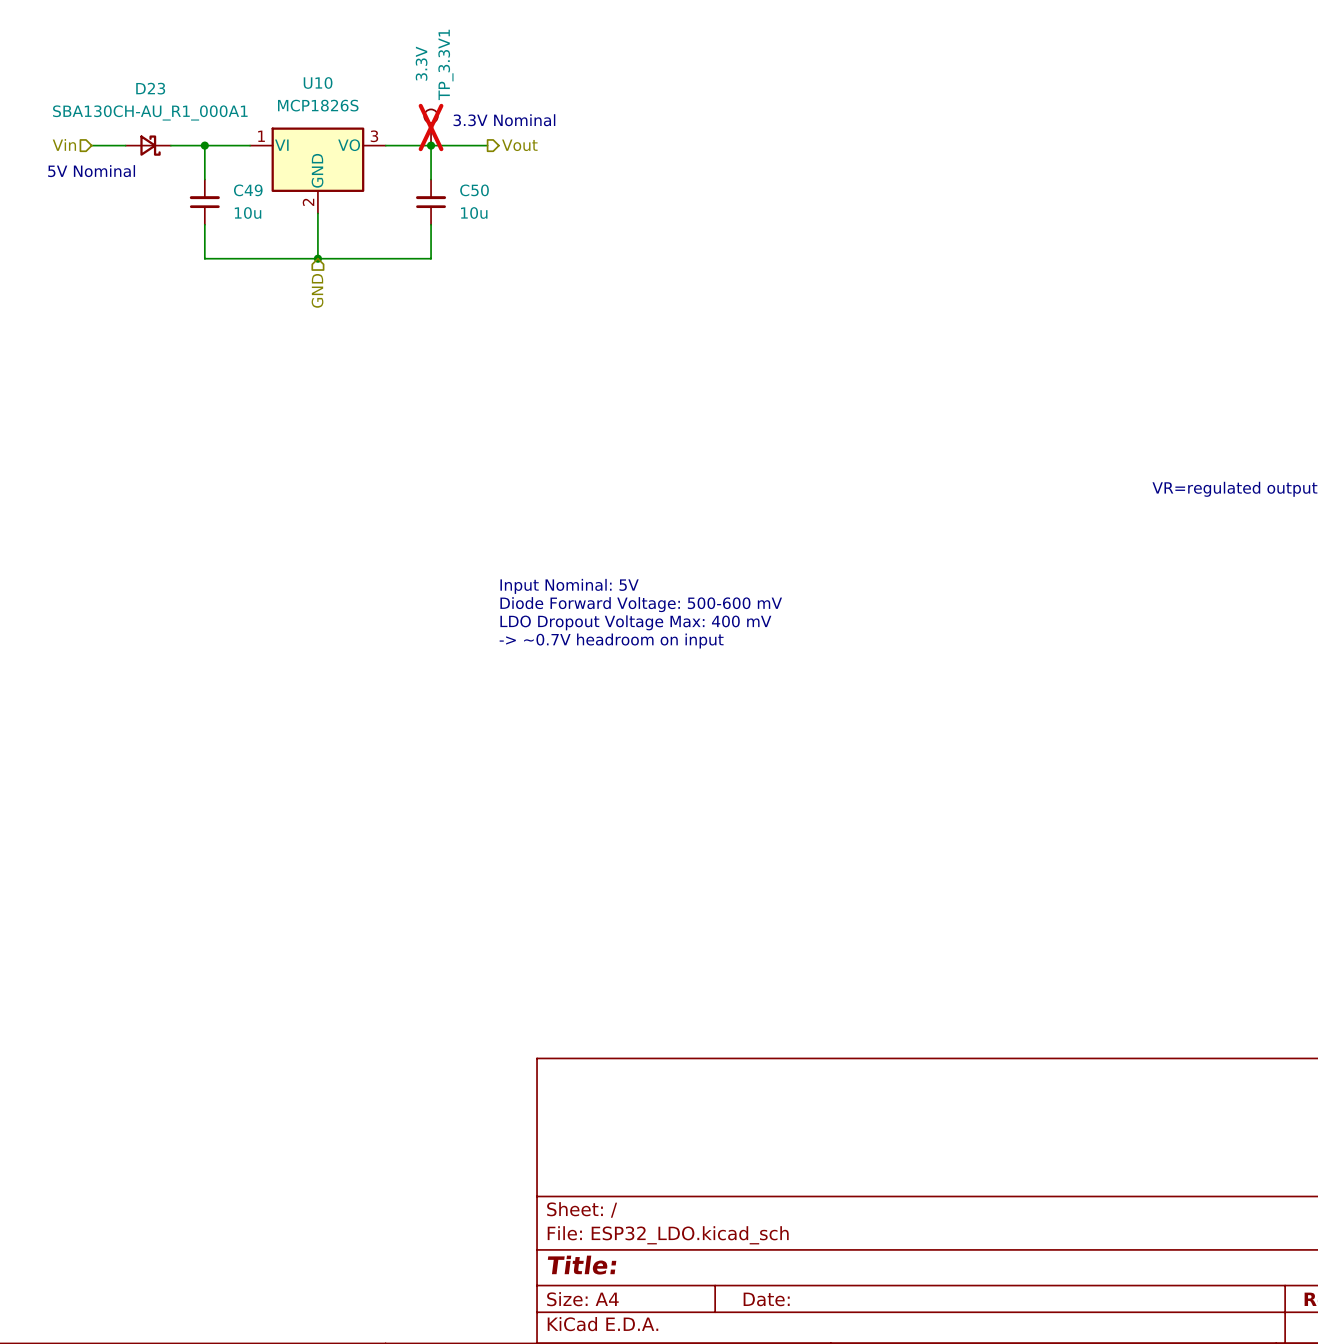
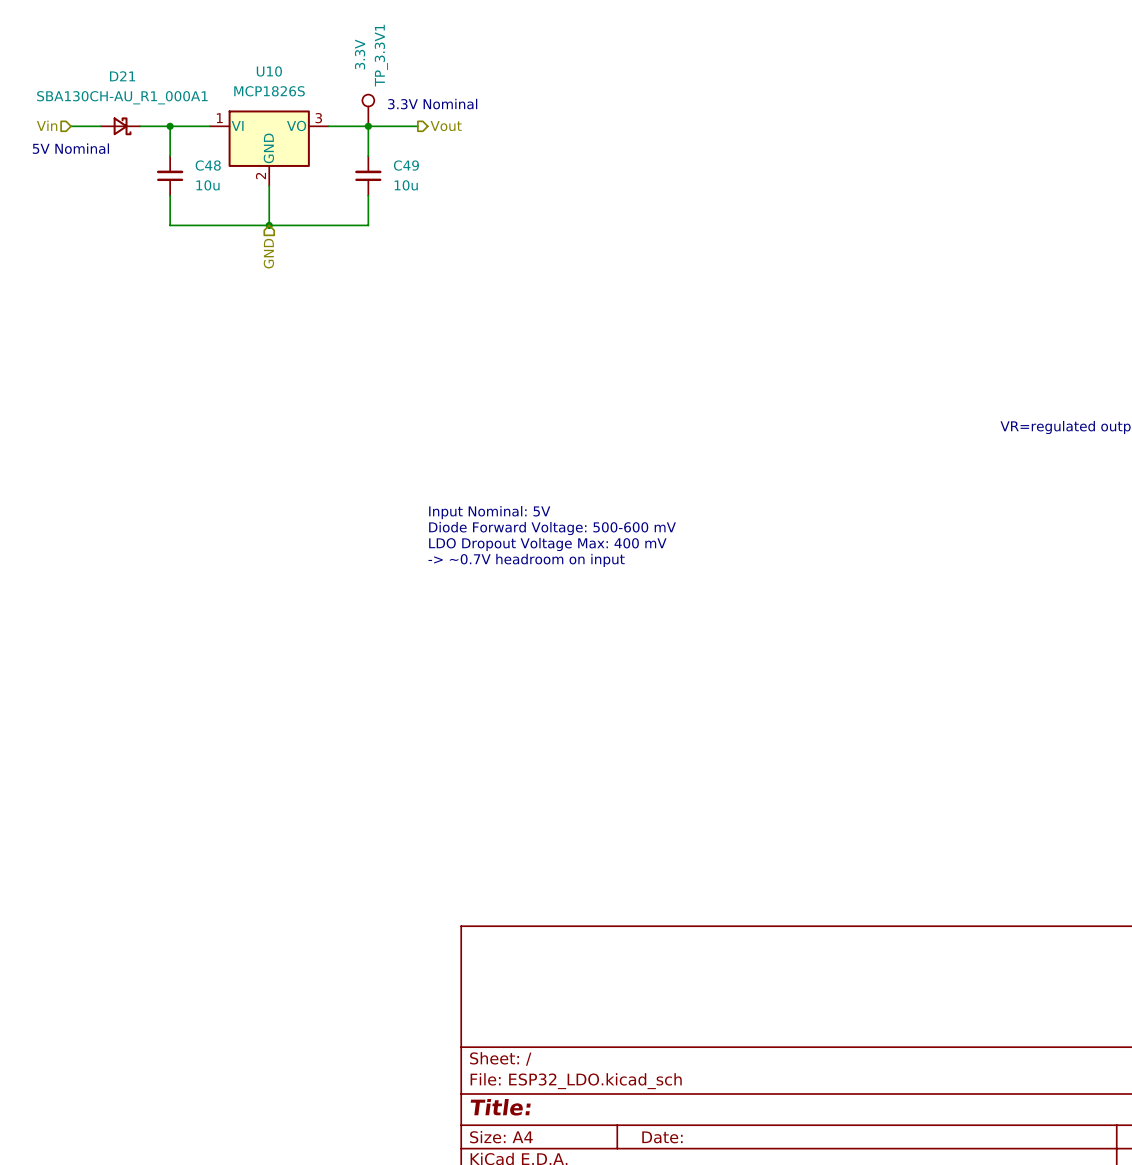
D23 name: D23 (150, 88) -> D21 (122, 76)
TP_3.3V1 do-not-place cross: (431, 127) -> none
C49 name: C49 (248, 190) -> C48 (208, 165)
C50 name: C50 (474, 190) -> C49 (406, 165)

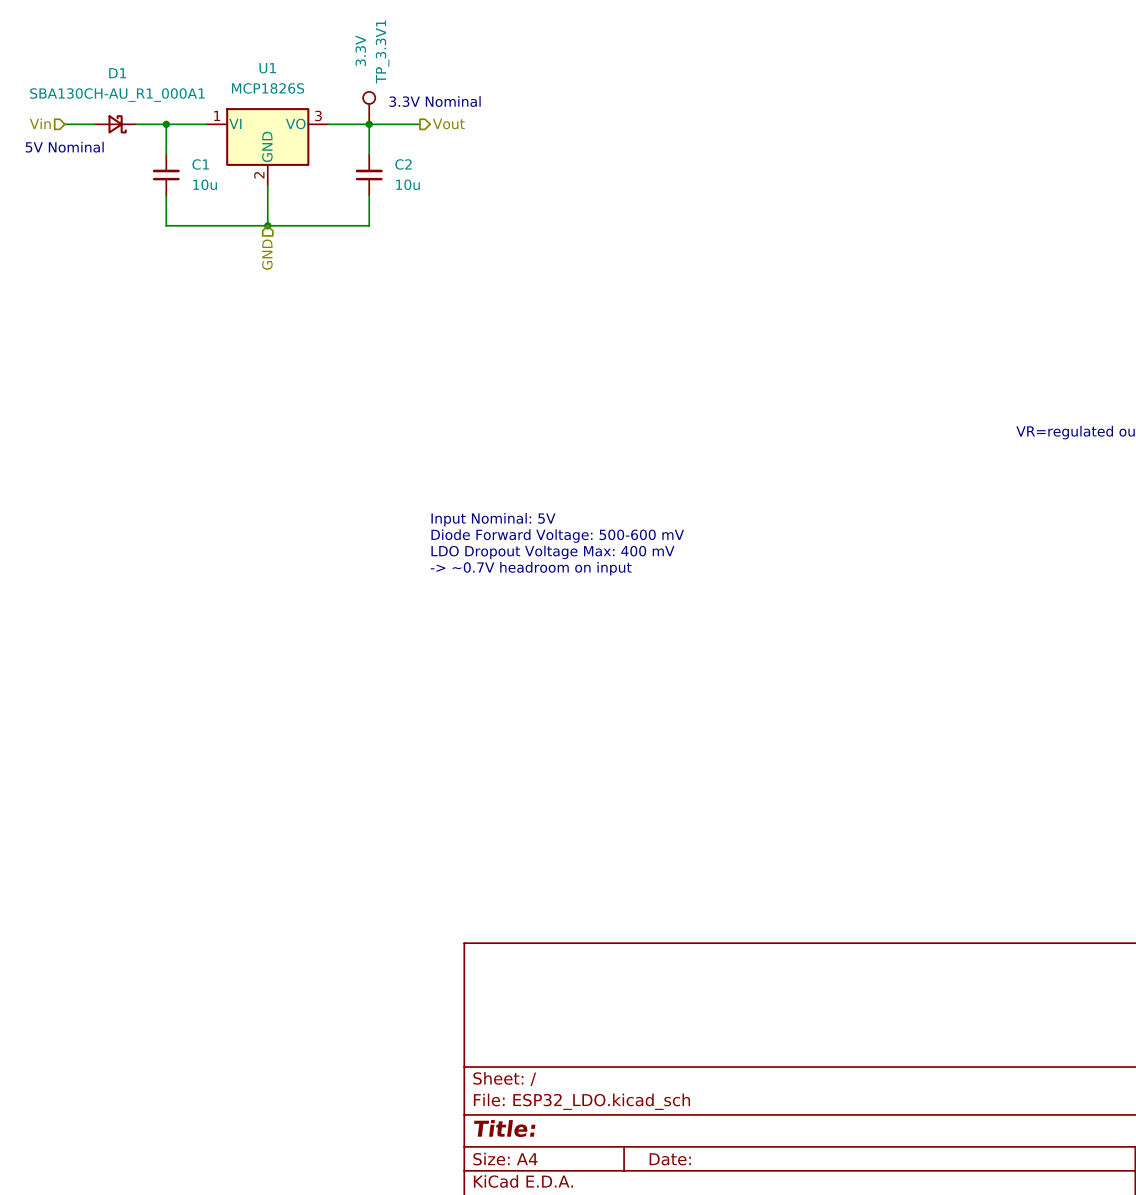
U10 name: U10 (269, 71) -> U1 (267, 68)
D21 name: D21 (122, 76) -> D1 (117, 73)
C48 name: C48 (208, 165) -> C1 (200, 164)
C49 name: C49 (406, 165) -> C2 (403, 164)

